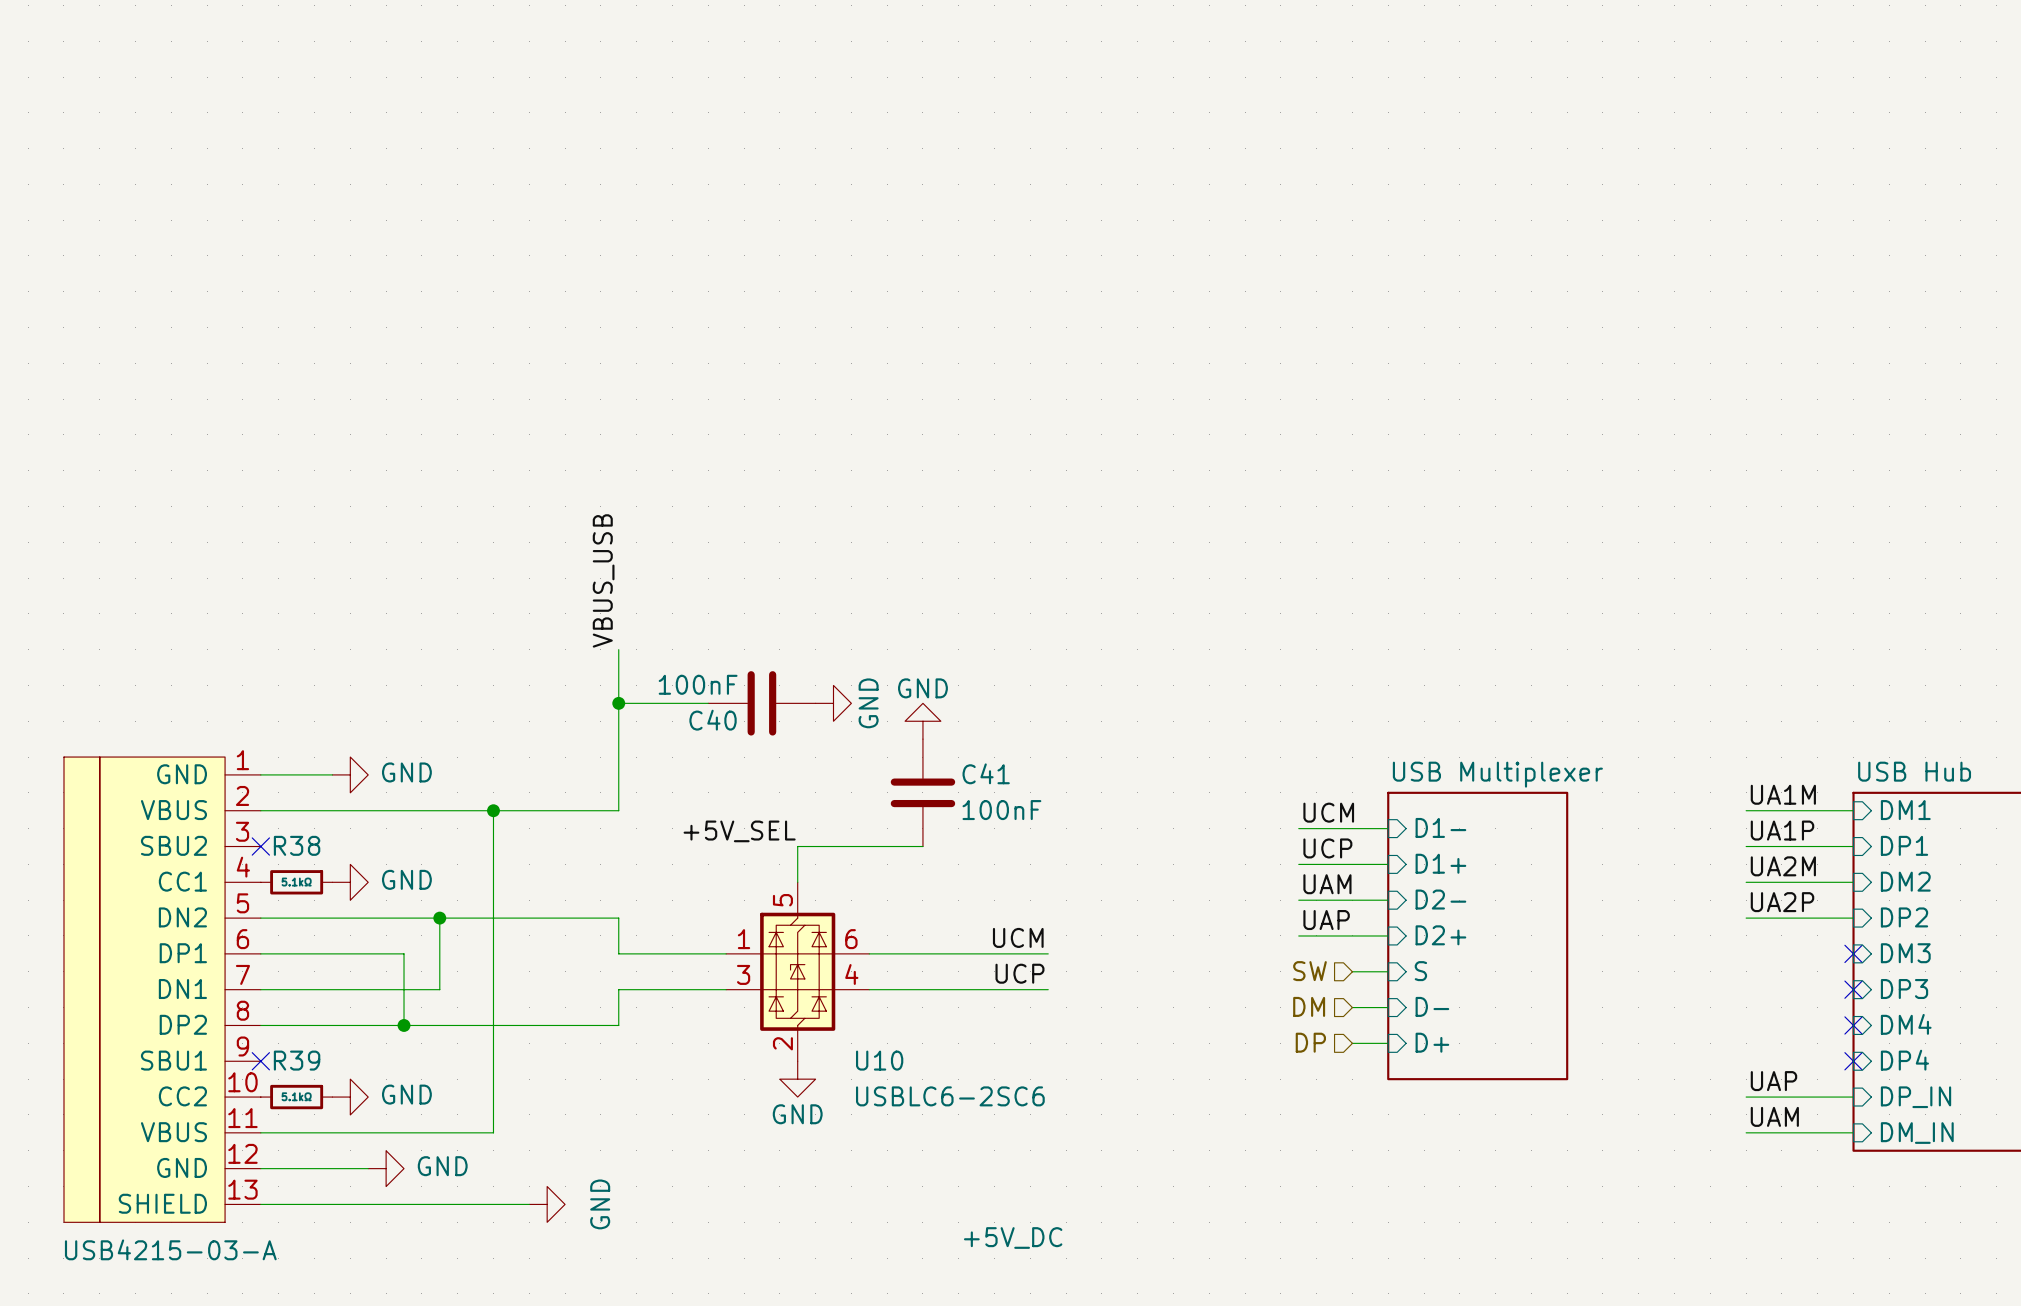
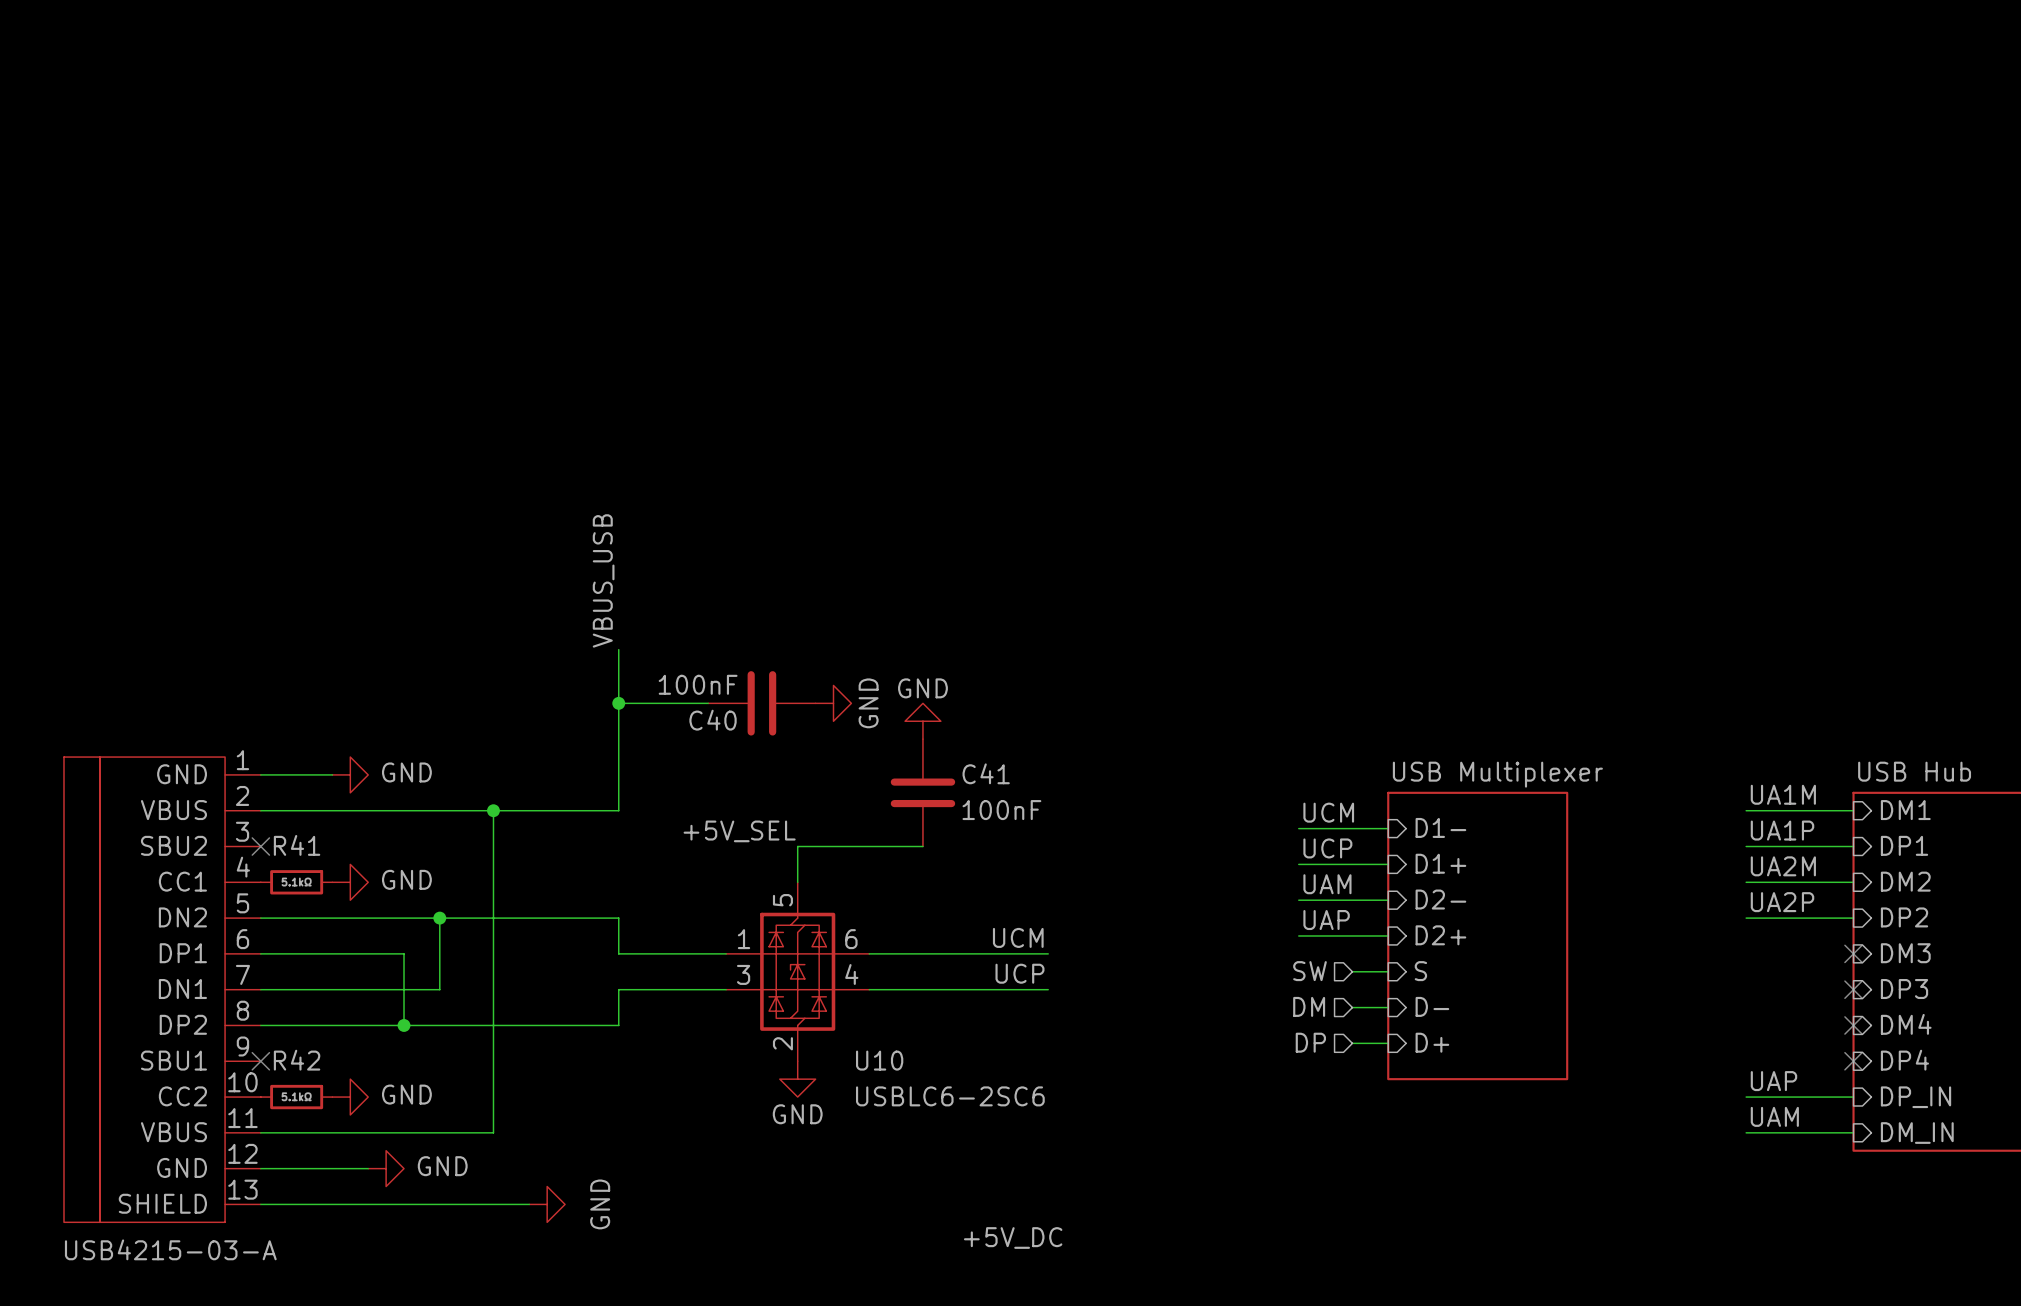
R38 name: R38 (297, 845) -> R41 (297, 845)
R39 name: R39 (297, 1060) -> R42 (297, 1060)

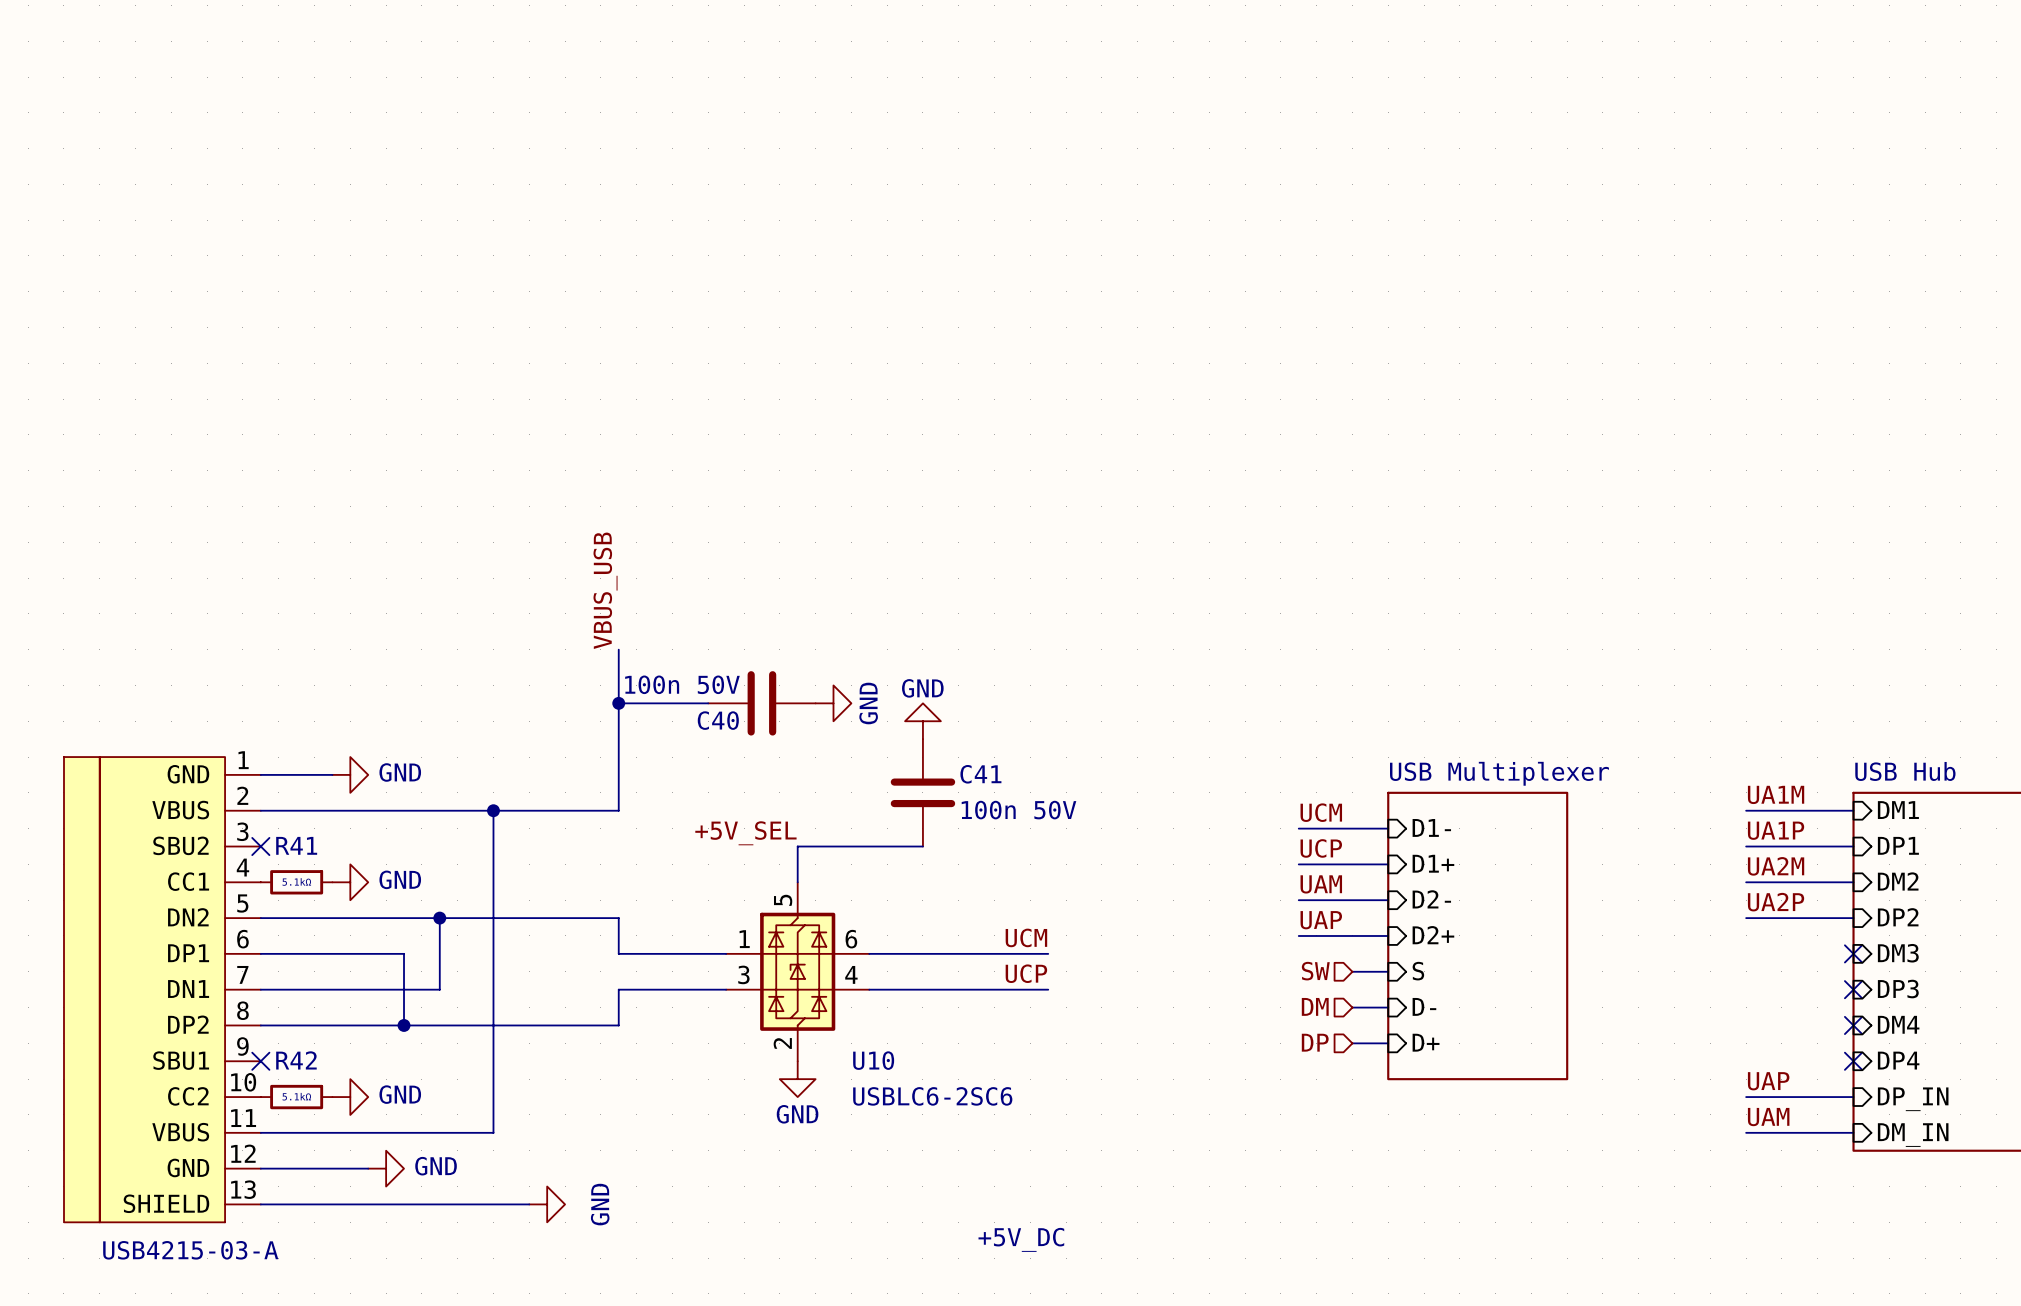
C40 value: 100nF (698, 684) -> 100n 50V (682, 684)
C41 value: 100nF (1001, 810) -> 100n 50V (1019, 810)

